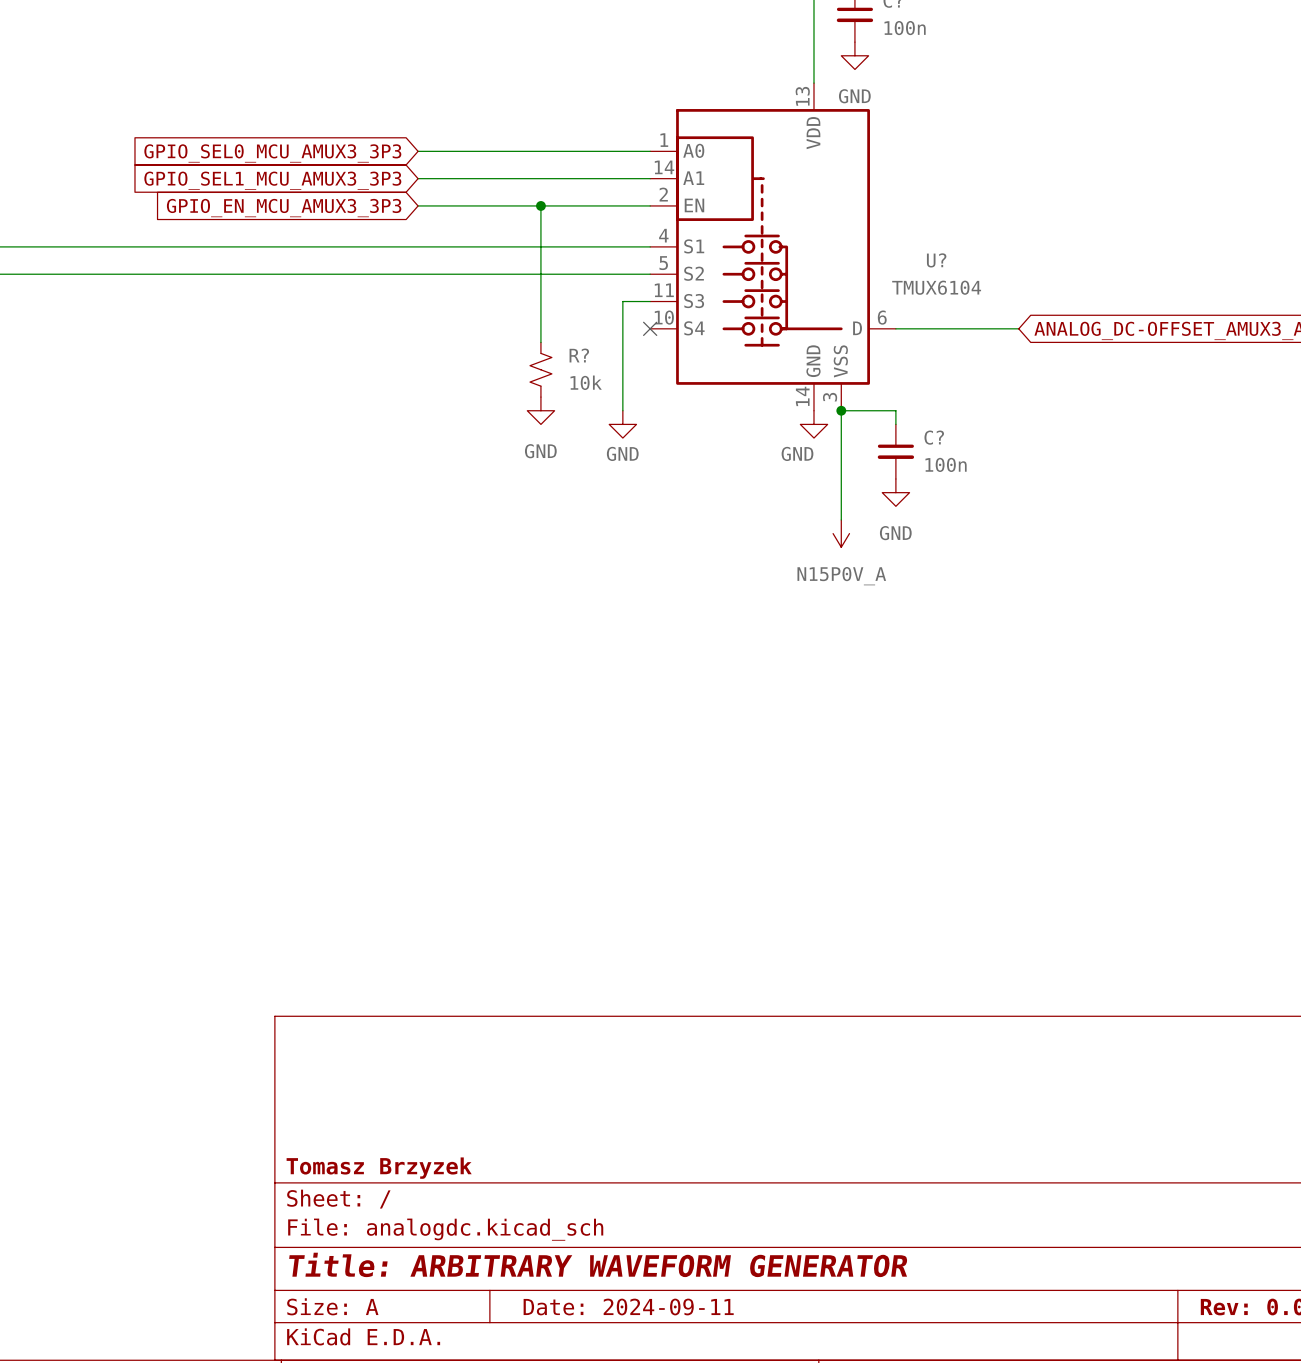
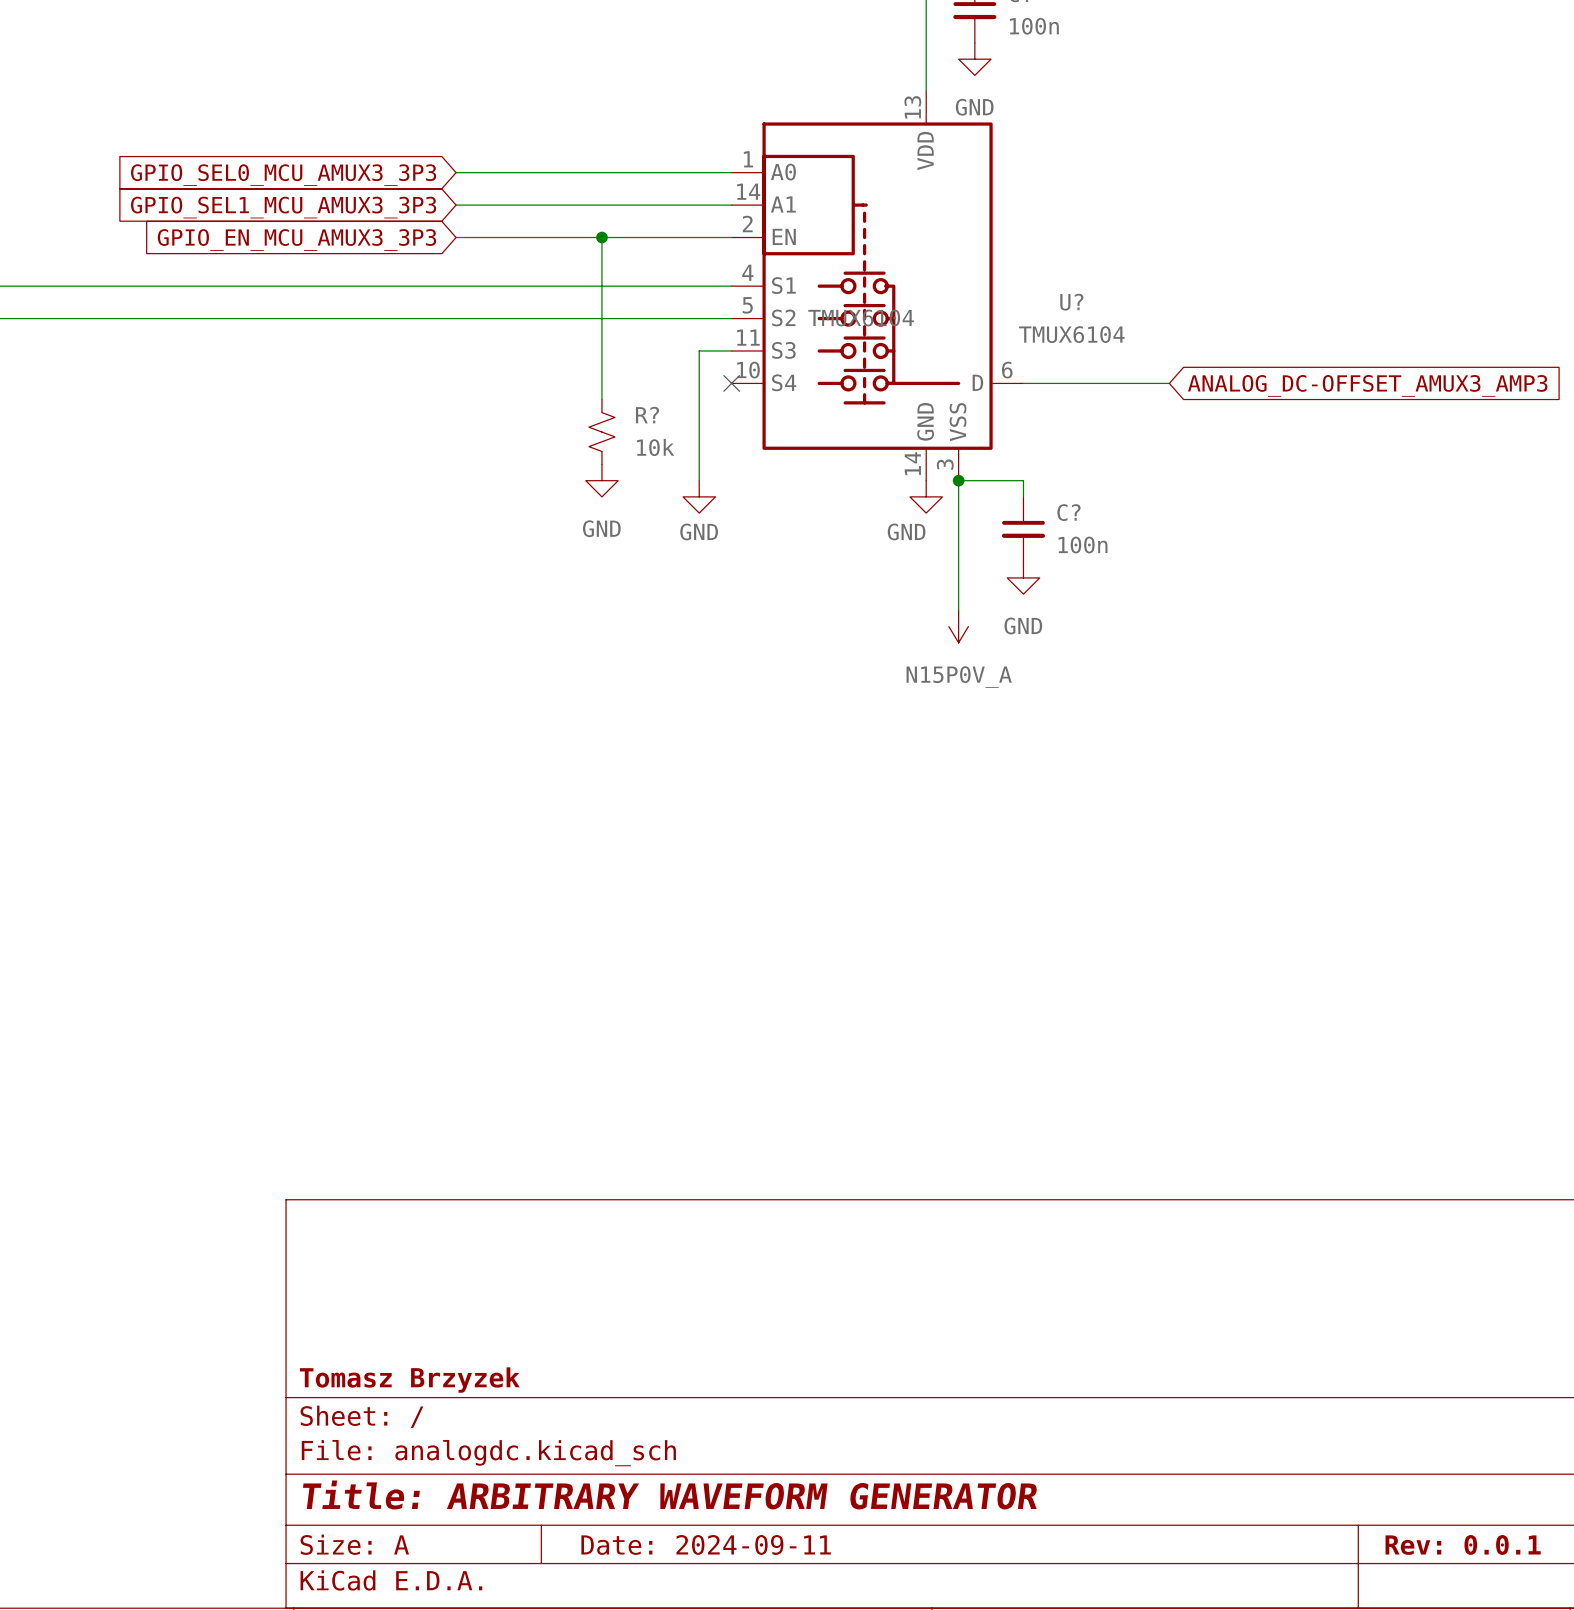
U? text: none -> TMUX6104 (861, 317)

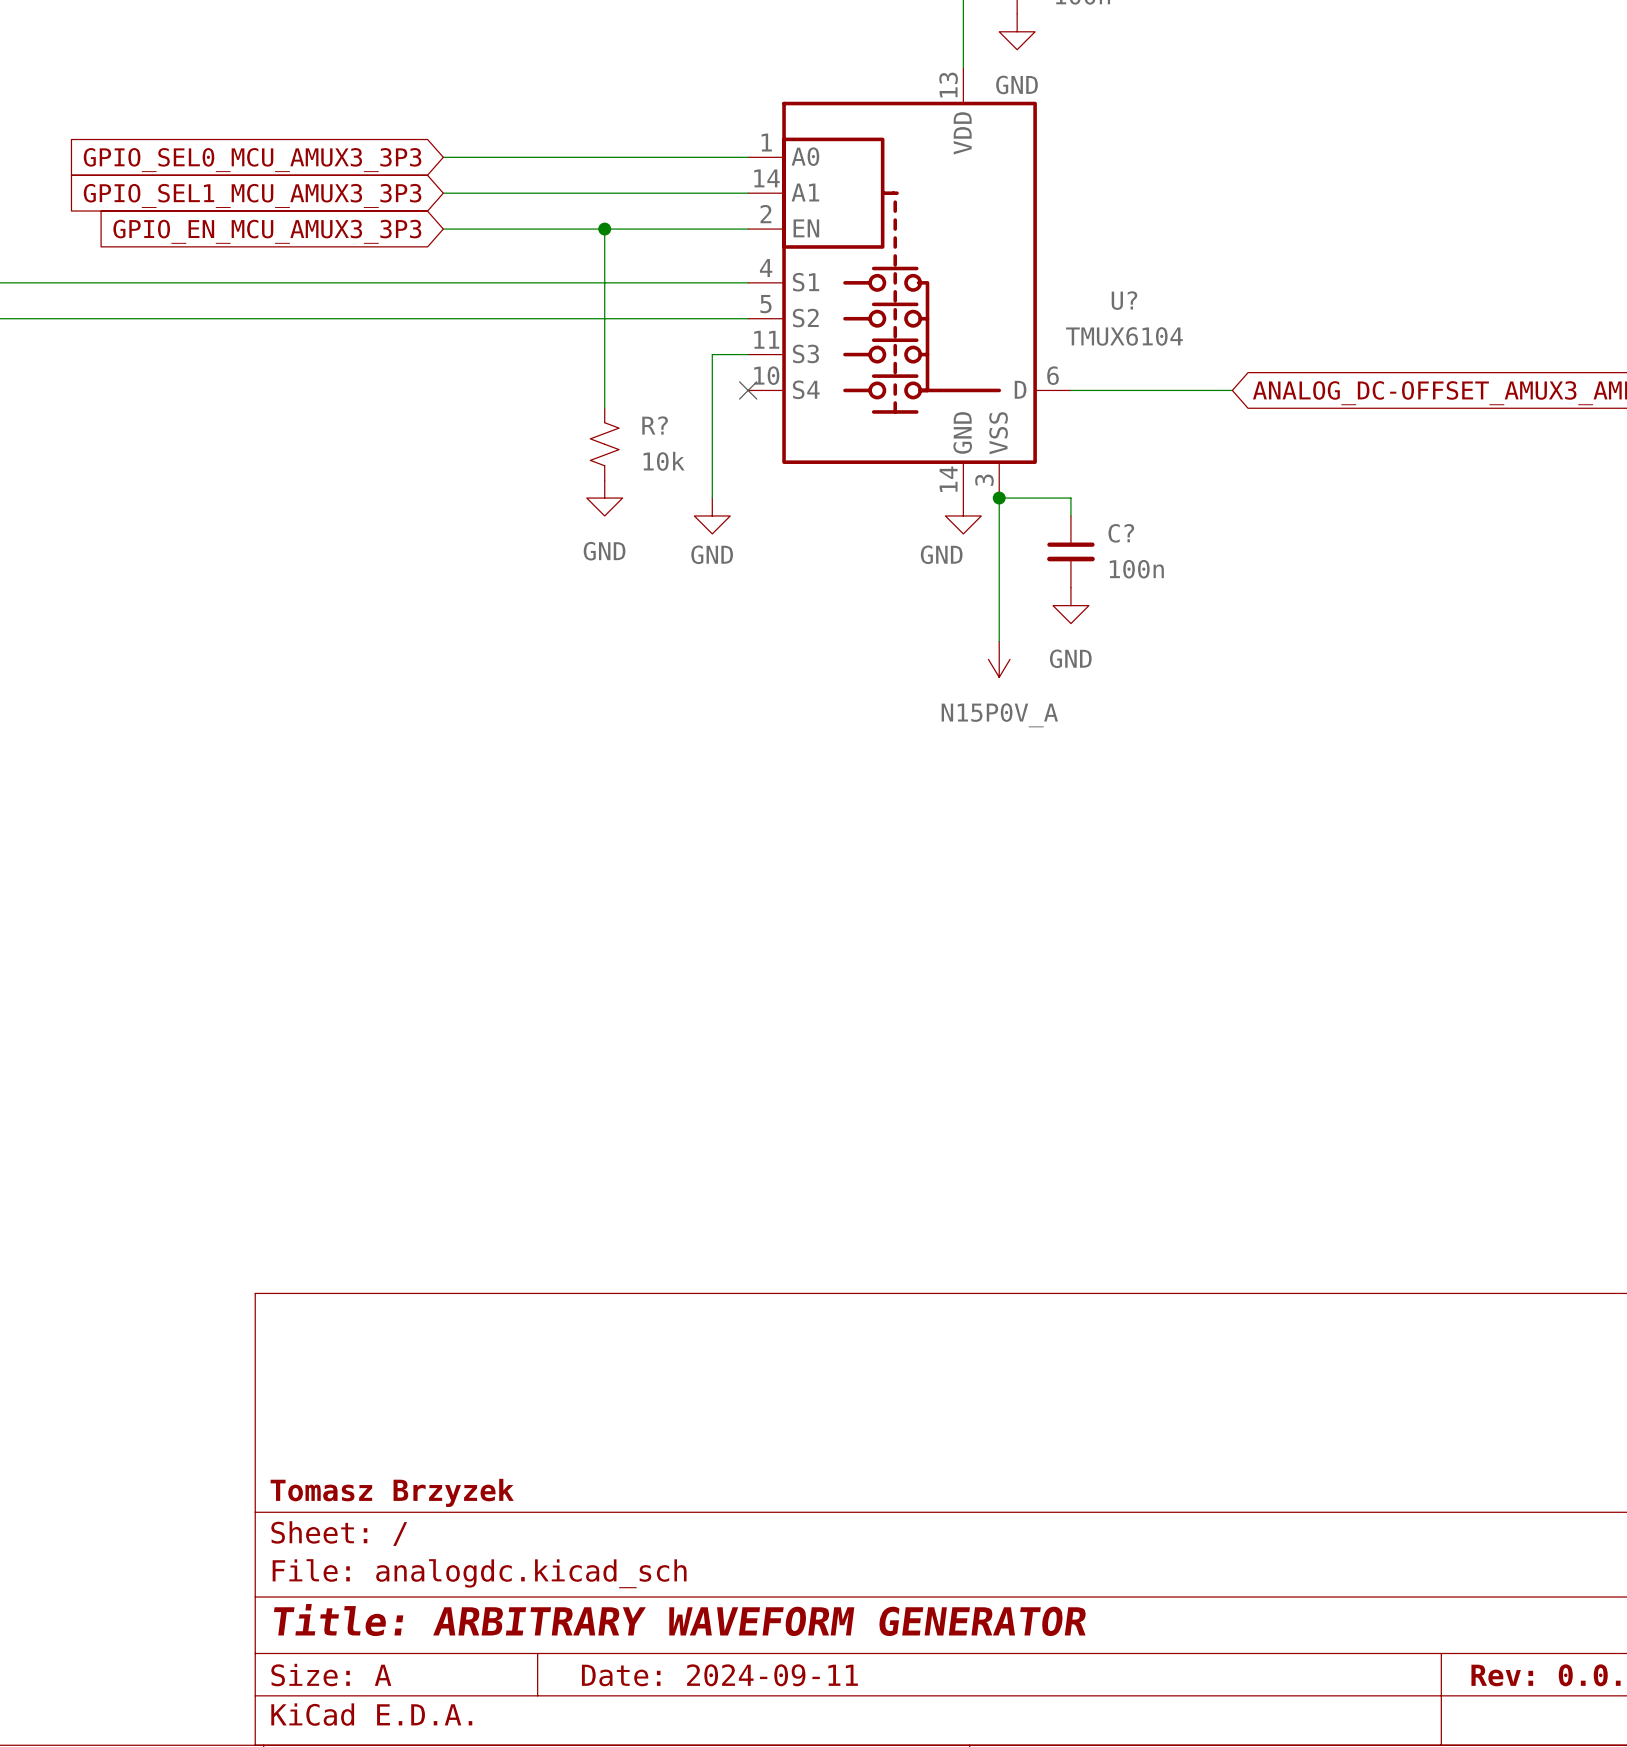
U? text: TMUX6104 (861, 317) -> none

